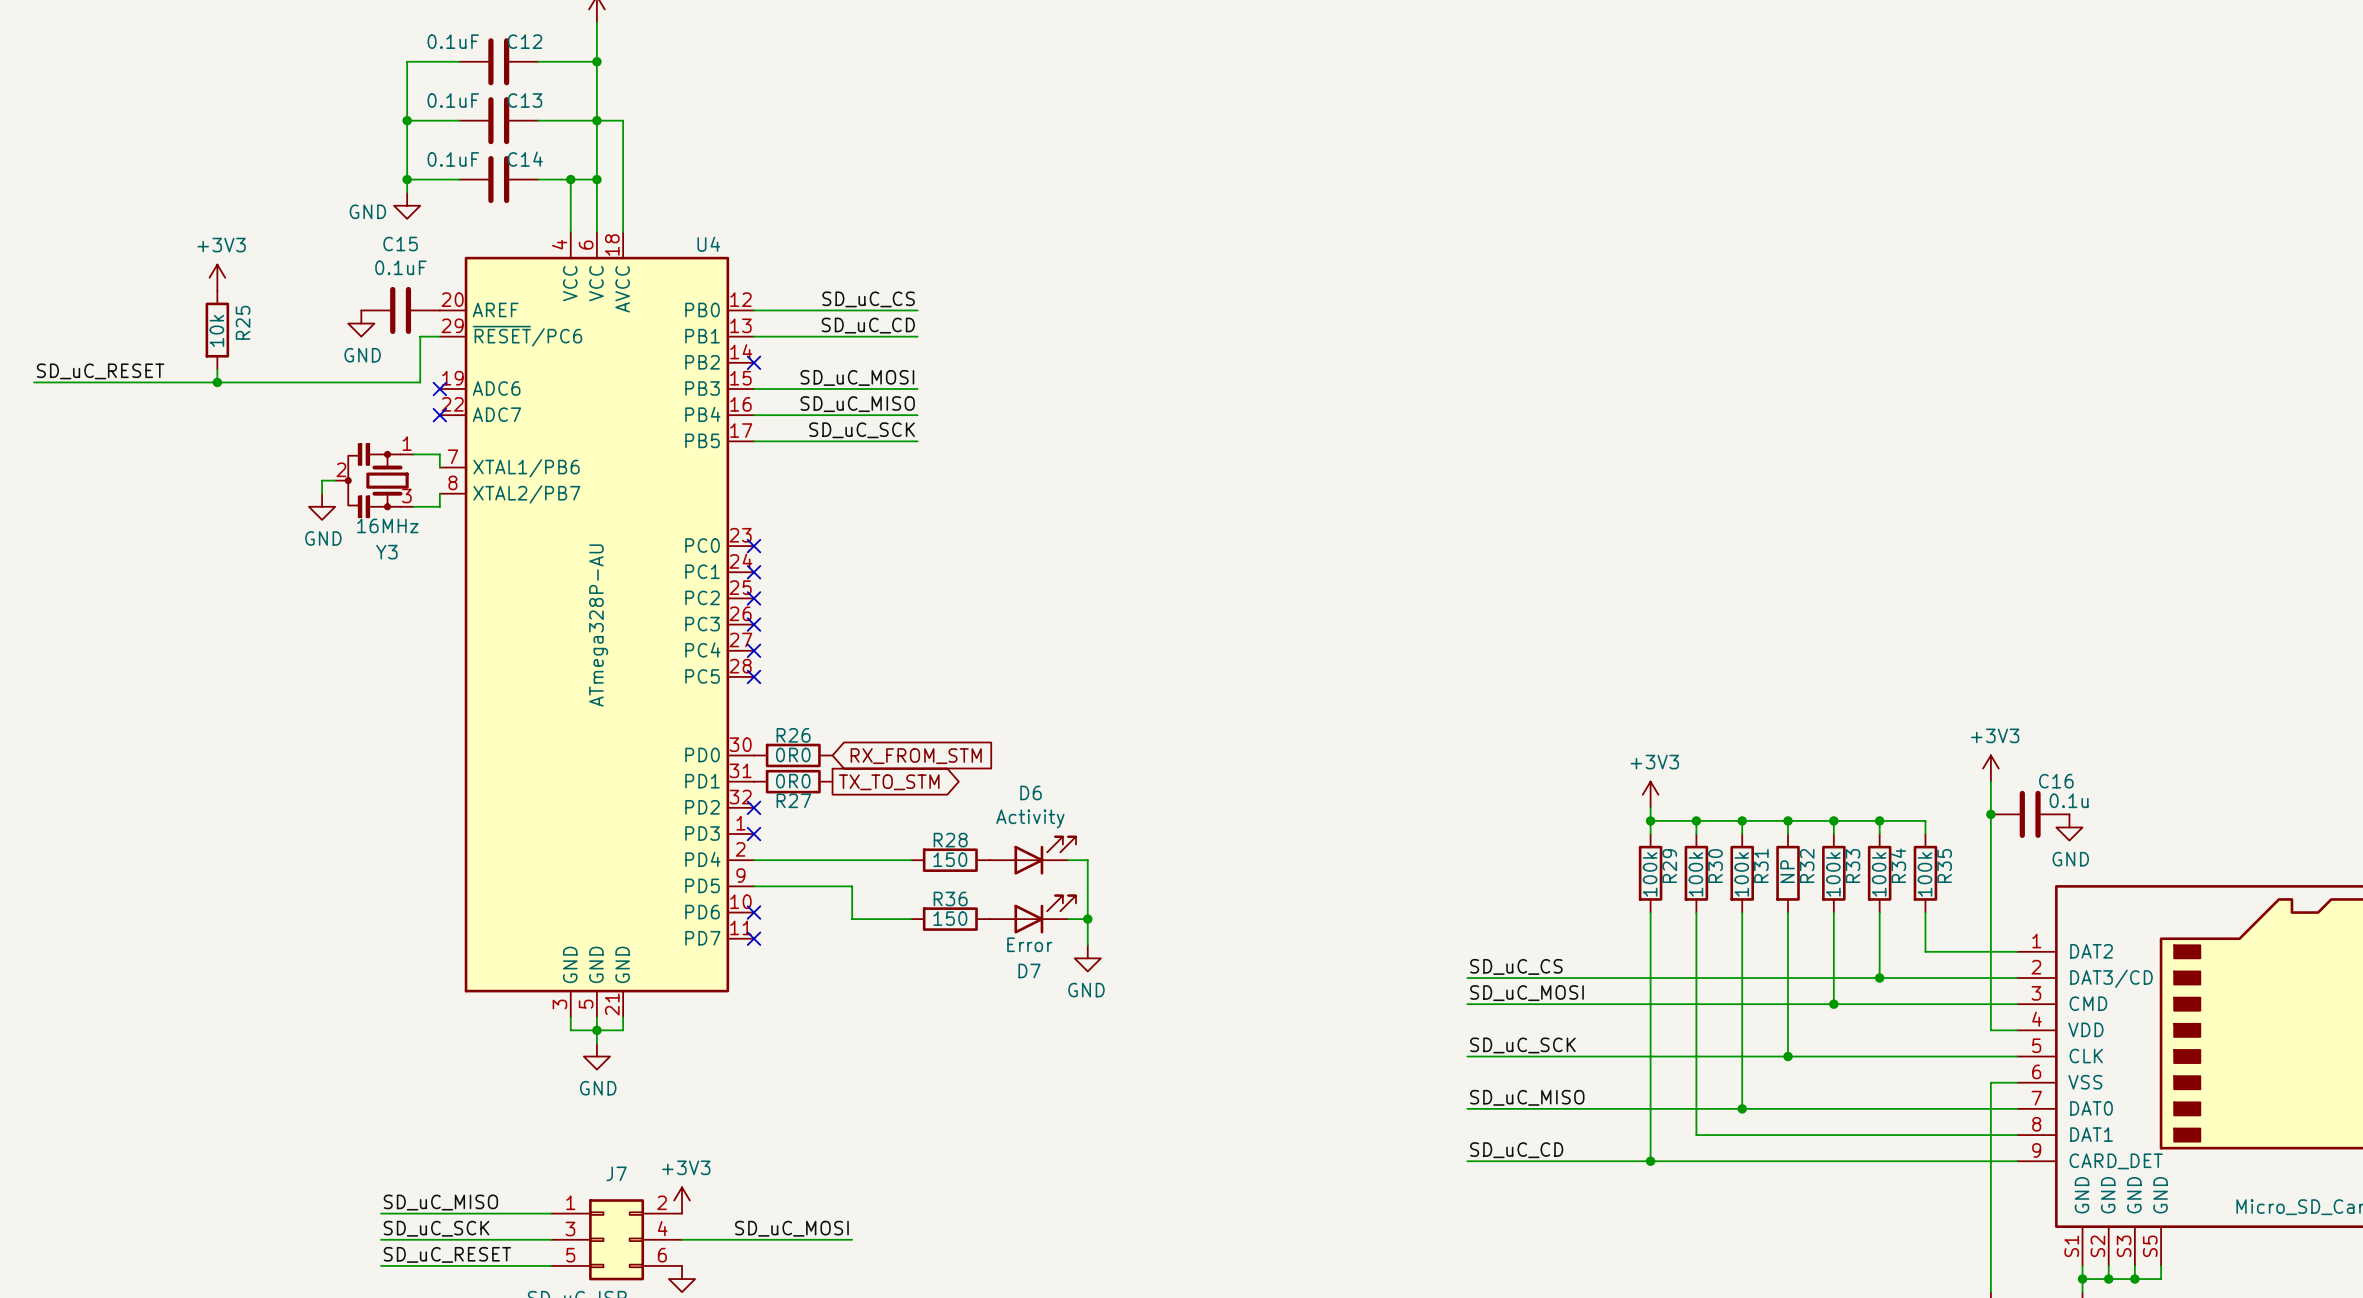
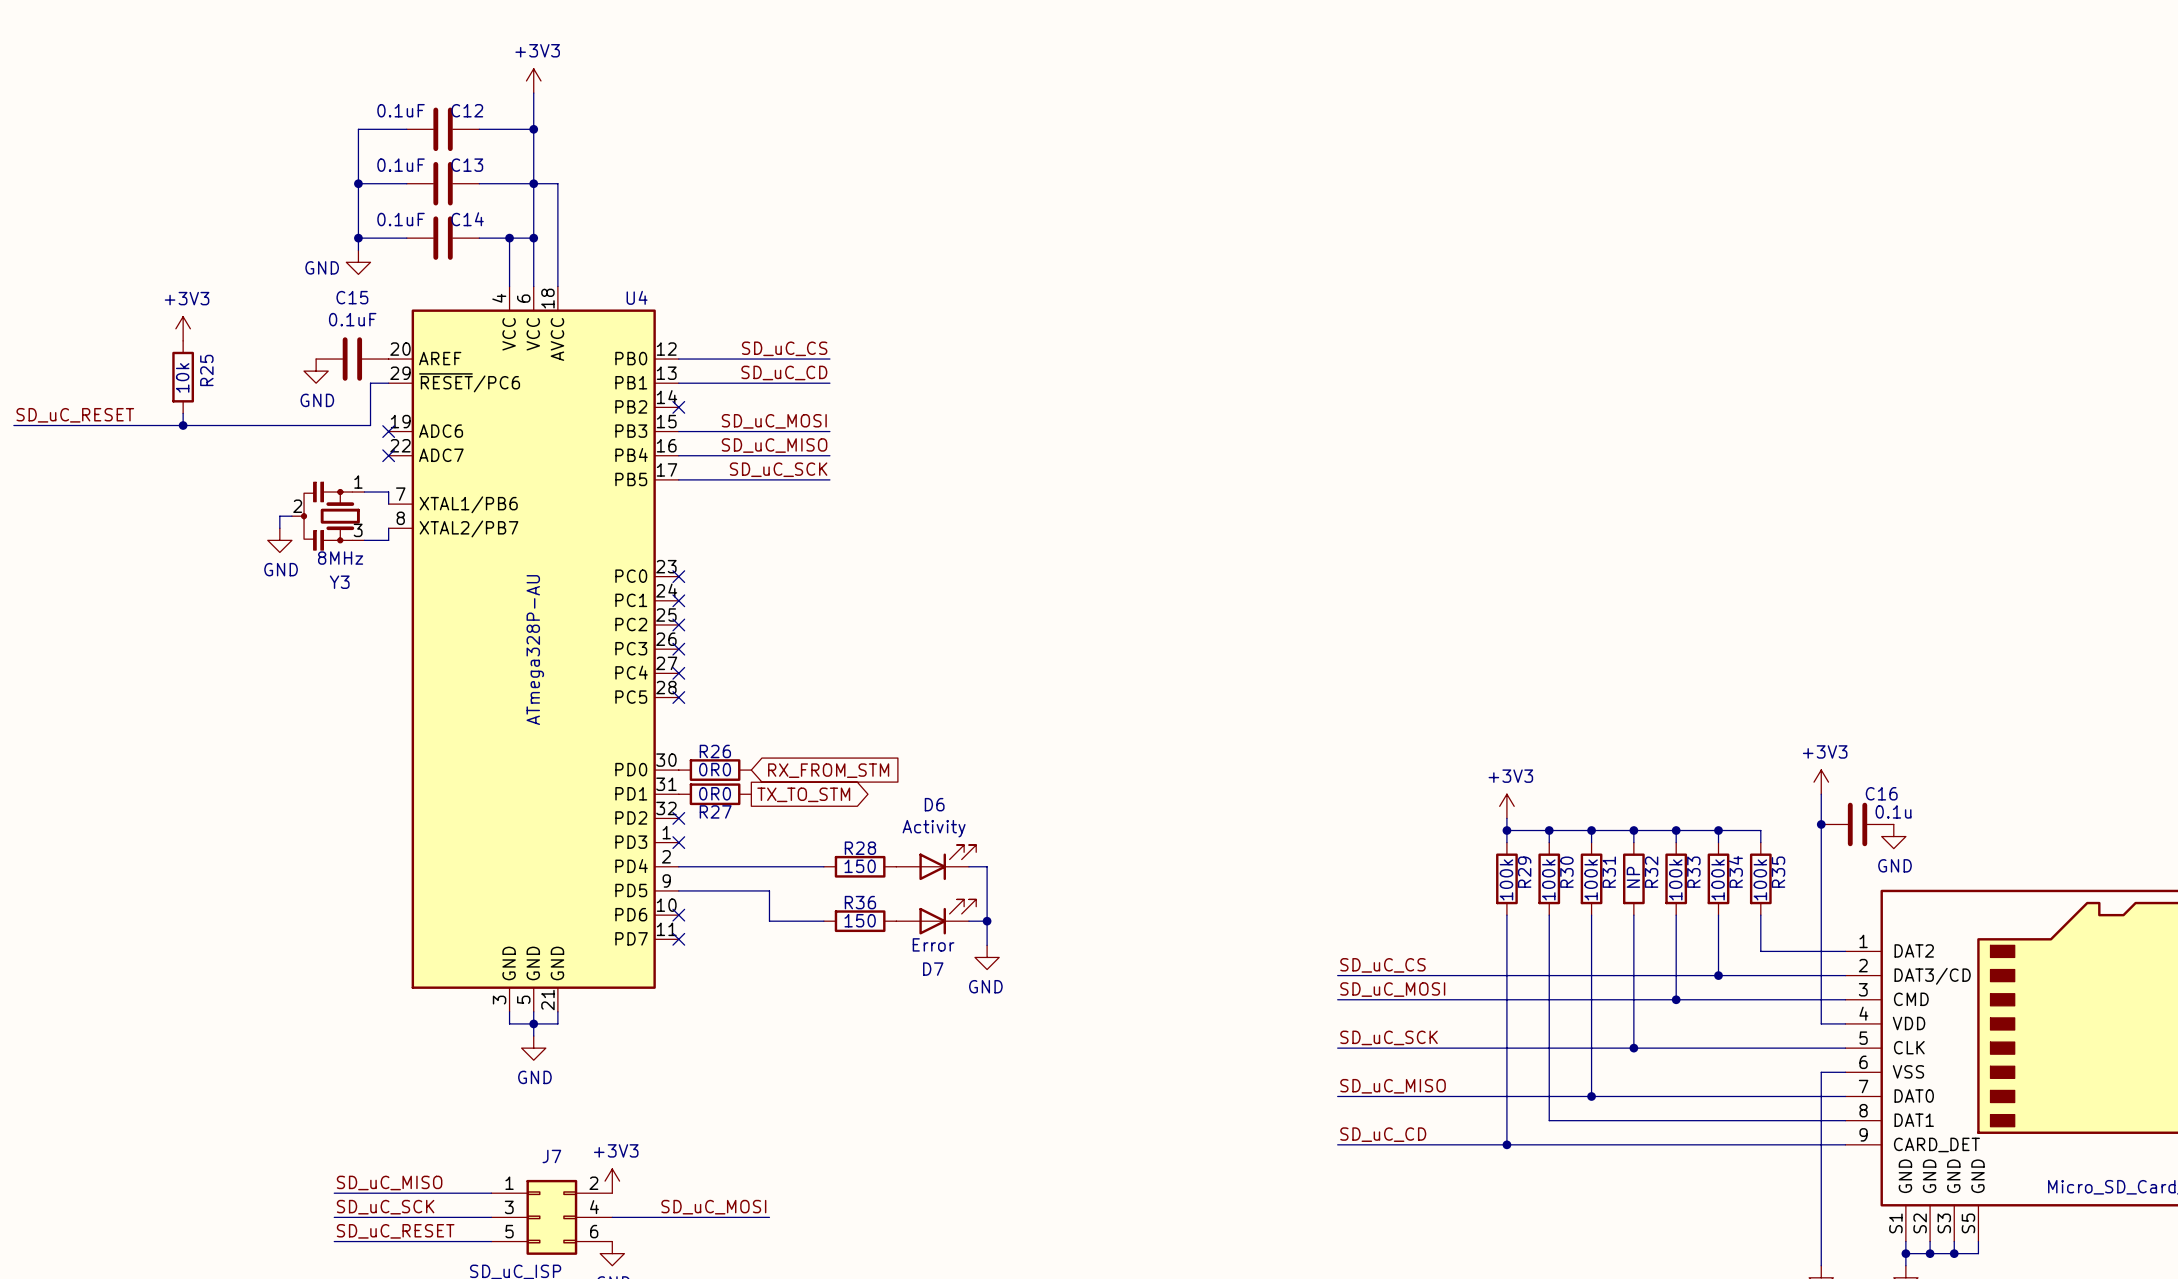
Y3 value: 16MHz (387, 525) -> 8MHz (340, 558)

